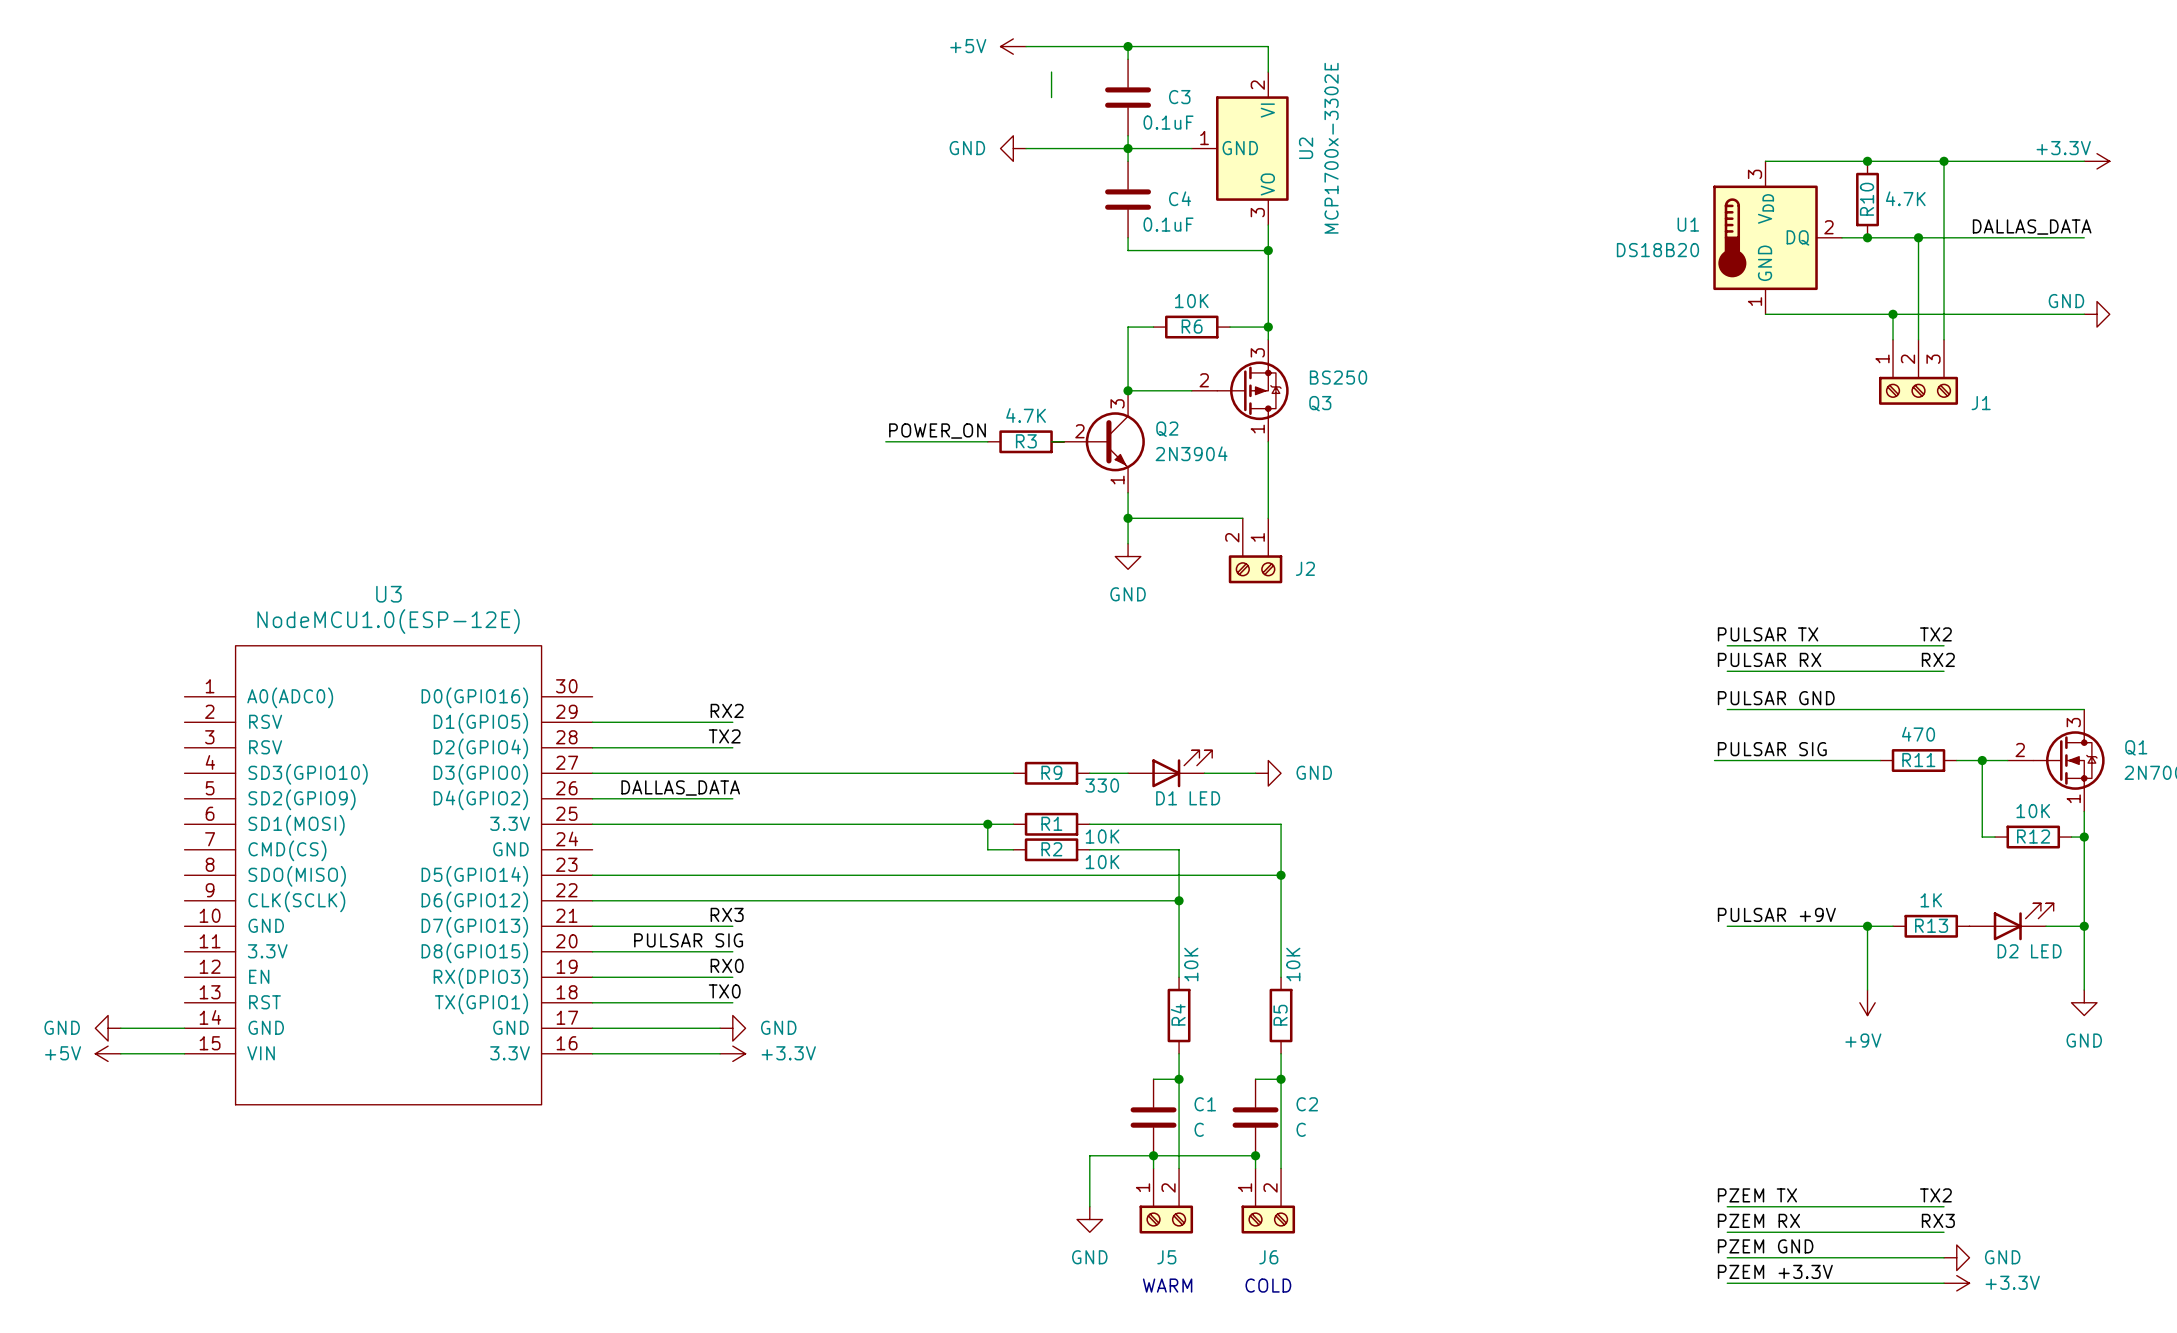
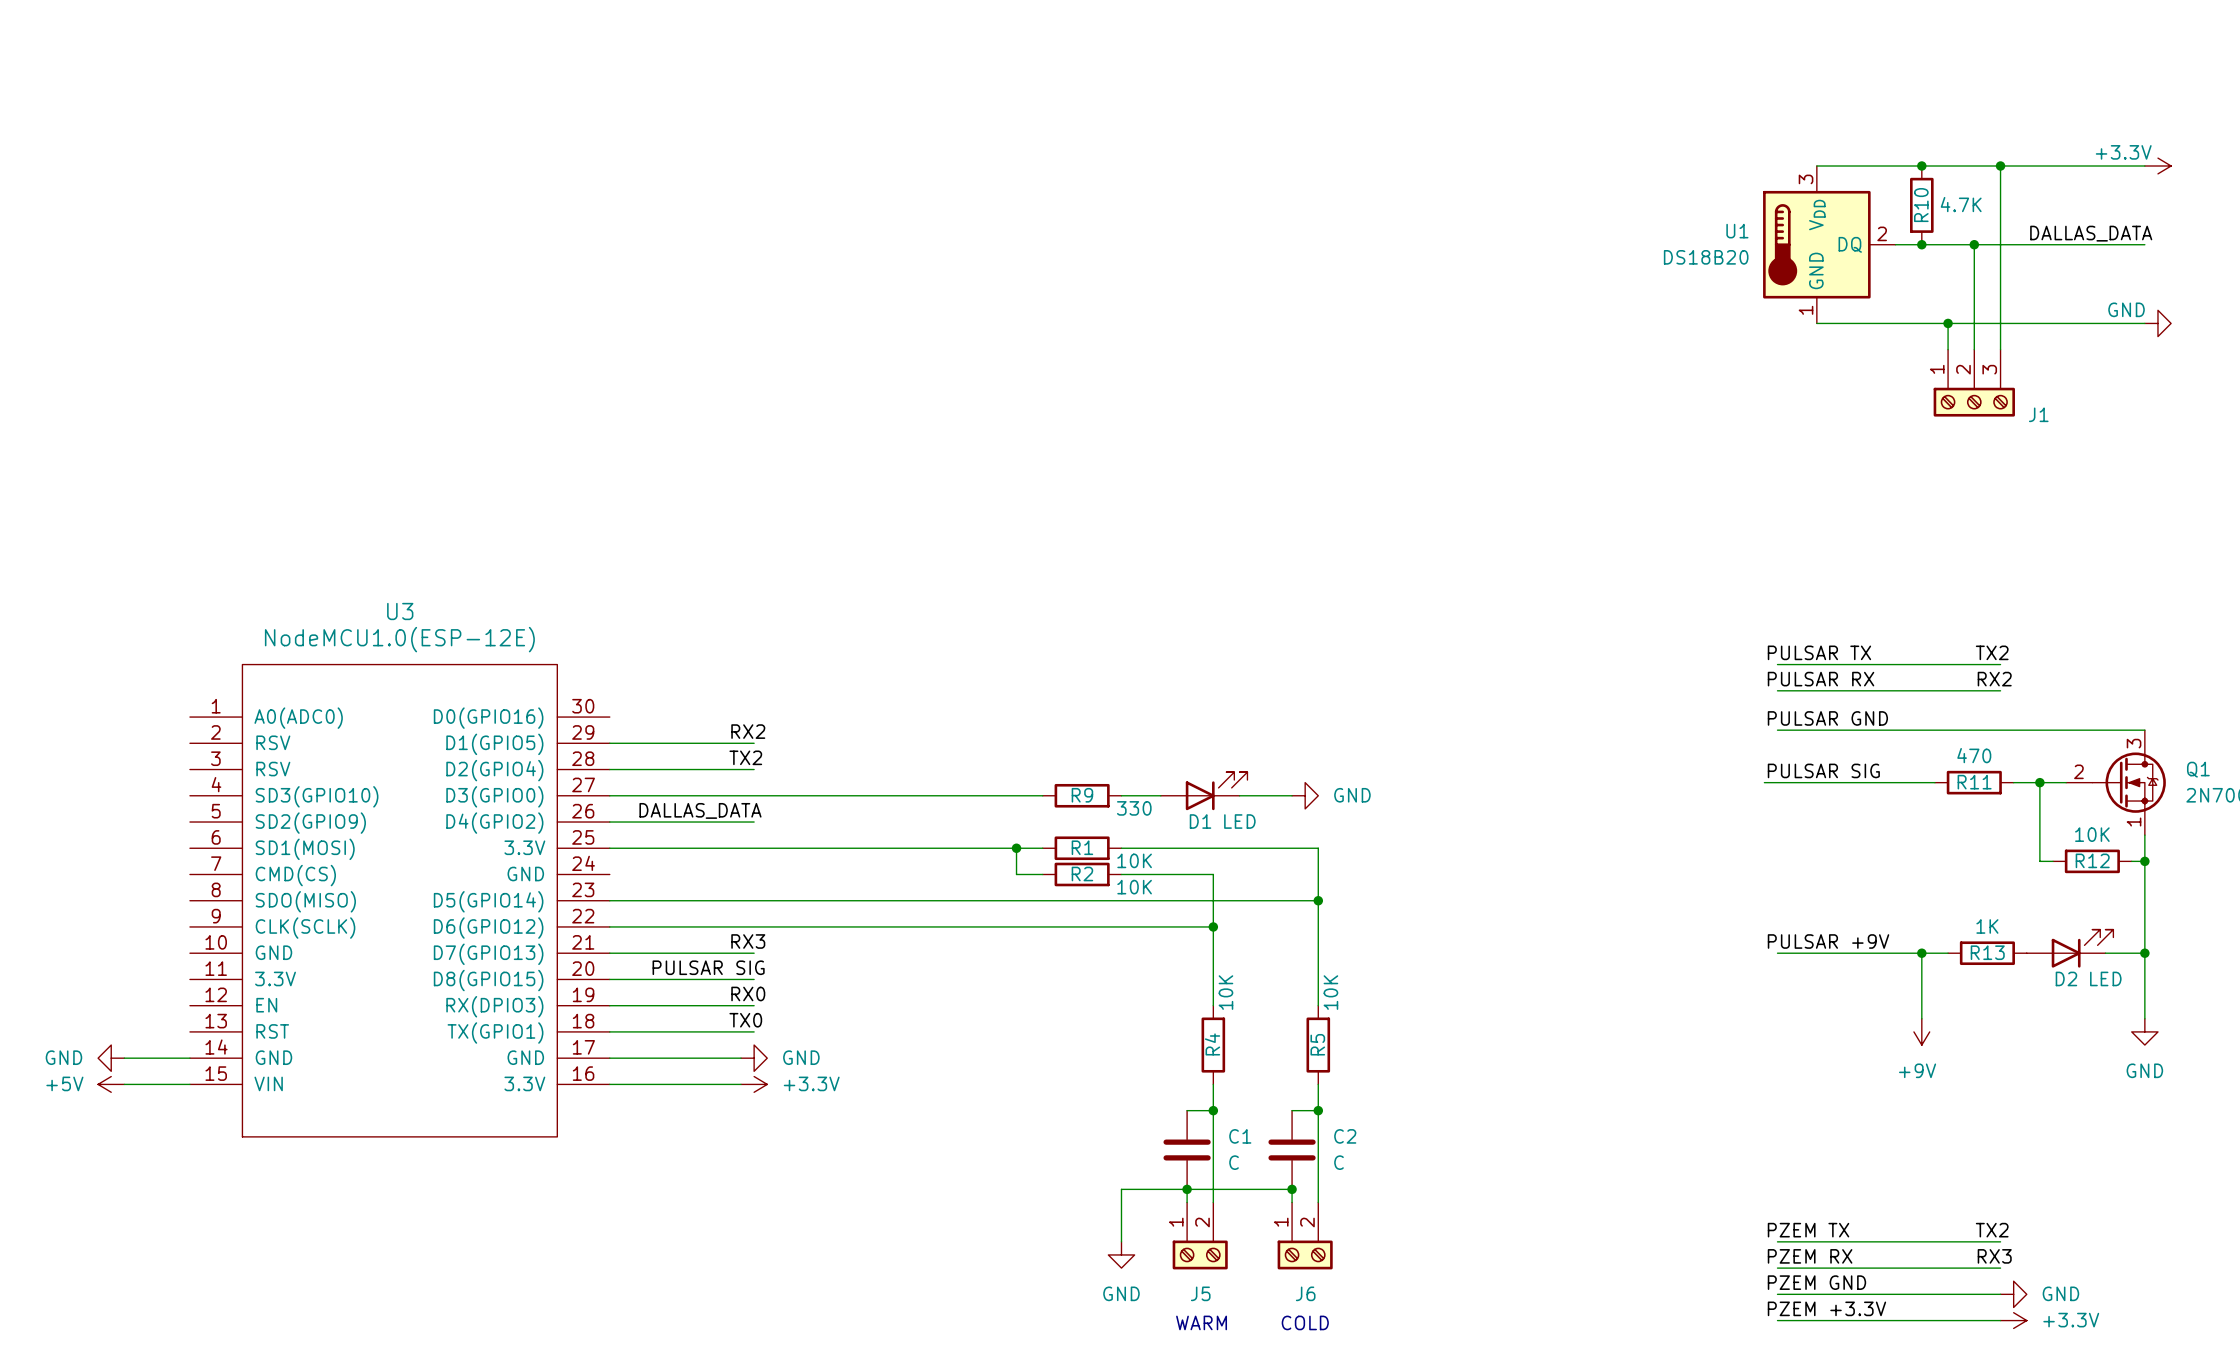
power symbol: +5V (1013, 46) -> none
wire: (1026, 46) (1268, 46) (1268, 72) -> none
wire: (1128, 46) (1128, 59) -> none
junction: (1128, 46) -> none
wire: (1051, 72) (1051, 97) -> none
C3: 0.1uF (1128, 97) -> none
wire: (1128, 135) (1128, 161) -> none
power symbol: GND (1013, 148) -> none
wire: (1026, 148) (1191, 148) -> none
junction: (1128, 148) -> none
U2: MCP1700x-3302E (1240, 148) -> none
C4: 0.1uF (1128, 199) -> none
wire: (1268, 225) (1268, 339) -> none
wire: (1128, 237) (1128, 250) (1268, 250) -> none
junction: (1268, 250) -> none
wire: (1153, 327) (1128, 327) (1128, 390) (1191, 390) -> none
R6: 10K (1191, 327) -> none
wire: (1230, 327) (1268, 327) -> none
junction: (1268, 327) -> none
junction: (1128, 390) -> none
Q3: BS250 (1240, 390) -> none
label: POWER_ON (937, 431) -> none
wire: (885, 441) (987, 441) -> none
R3: 4.7K (1026, 441) -> none
wire: (1051, 441) (1064, 441) -> none
Q2: 2N3904 (1098, 441) -> none
wire: (1268, 441) (1268, 518) -> none
wire: (1128, 492) (1128, 543) -> none
wire: (1128, 518) (1242, 518) -> none
junction: (1128, 518) -> none
J2: (1255, 550) -> none
power symbol: GND (1128, 556) -> none

